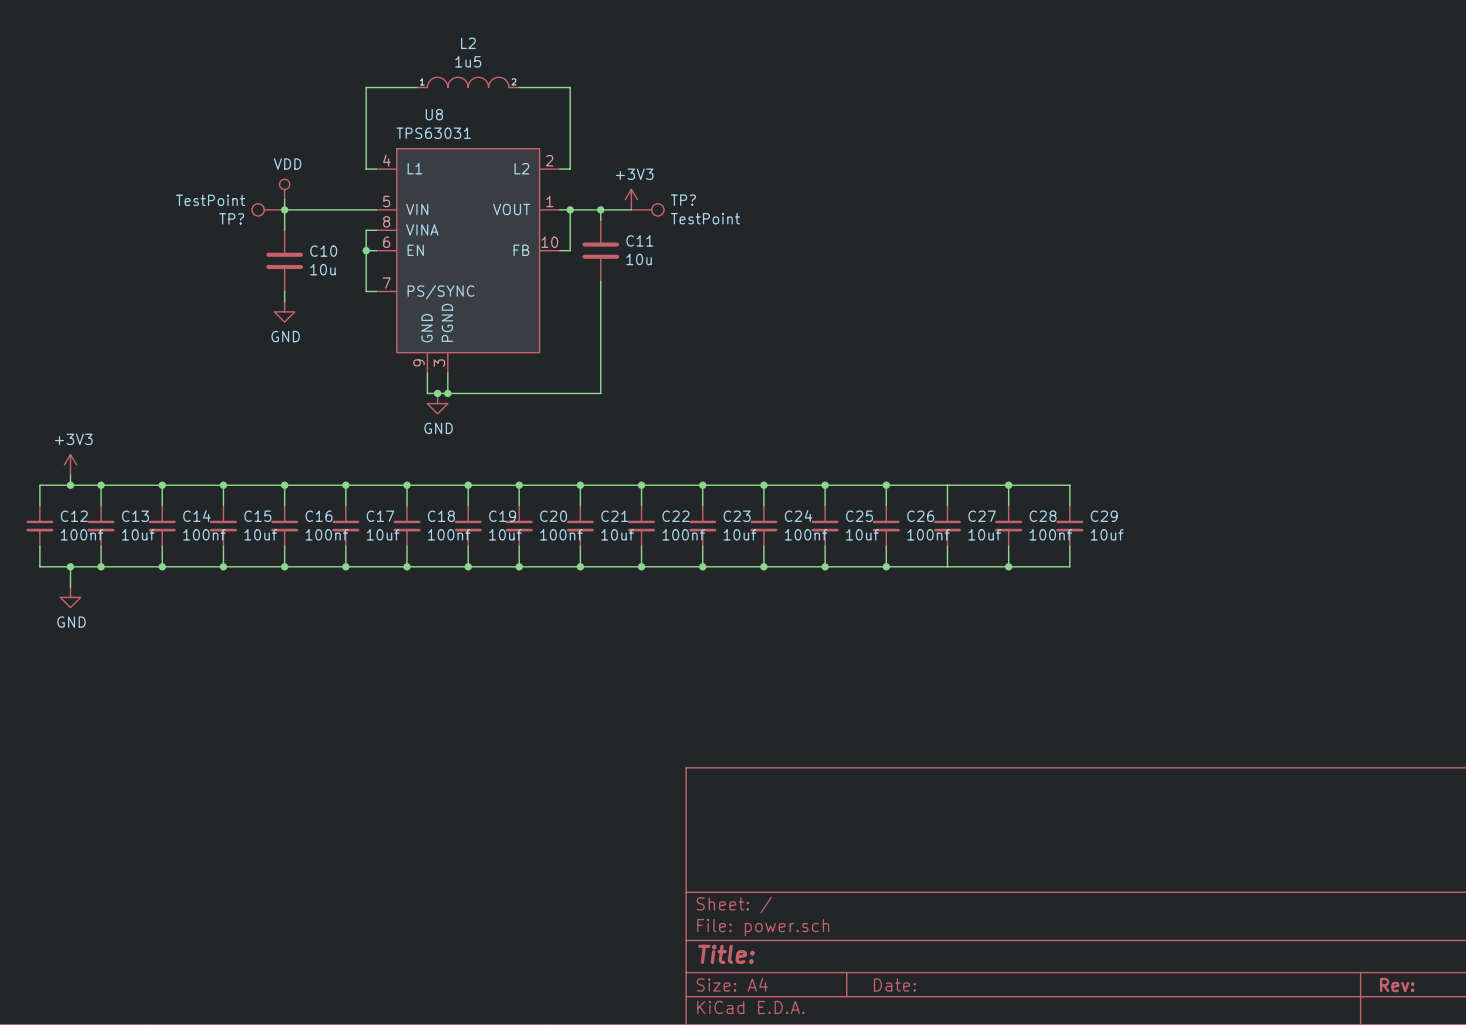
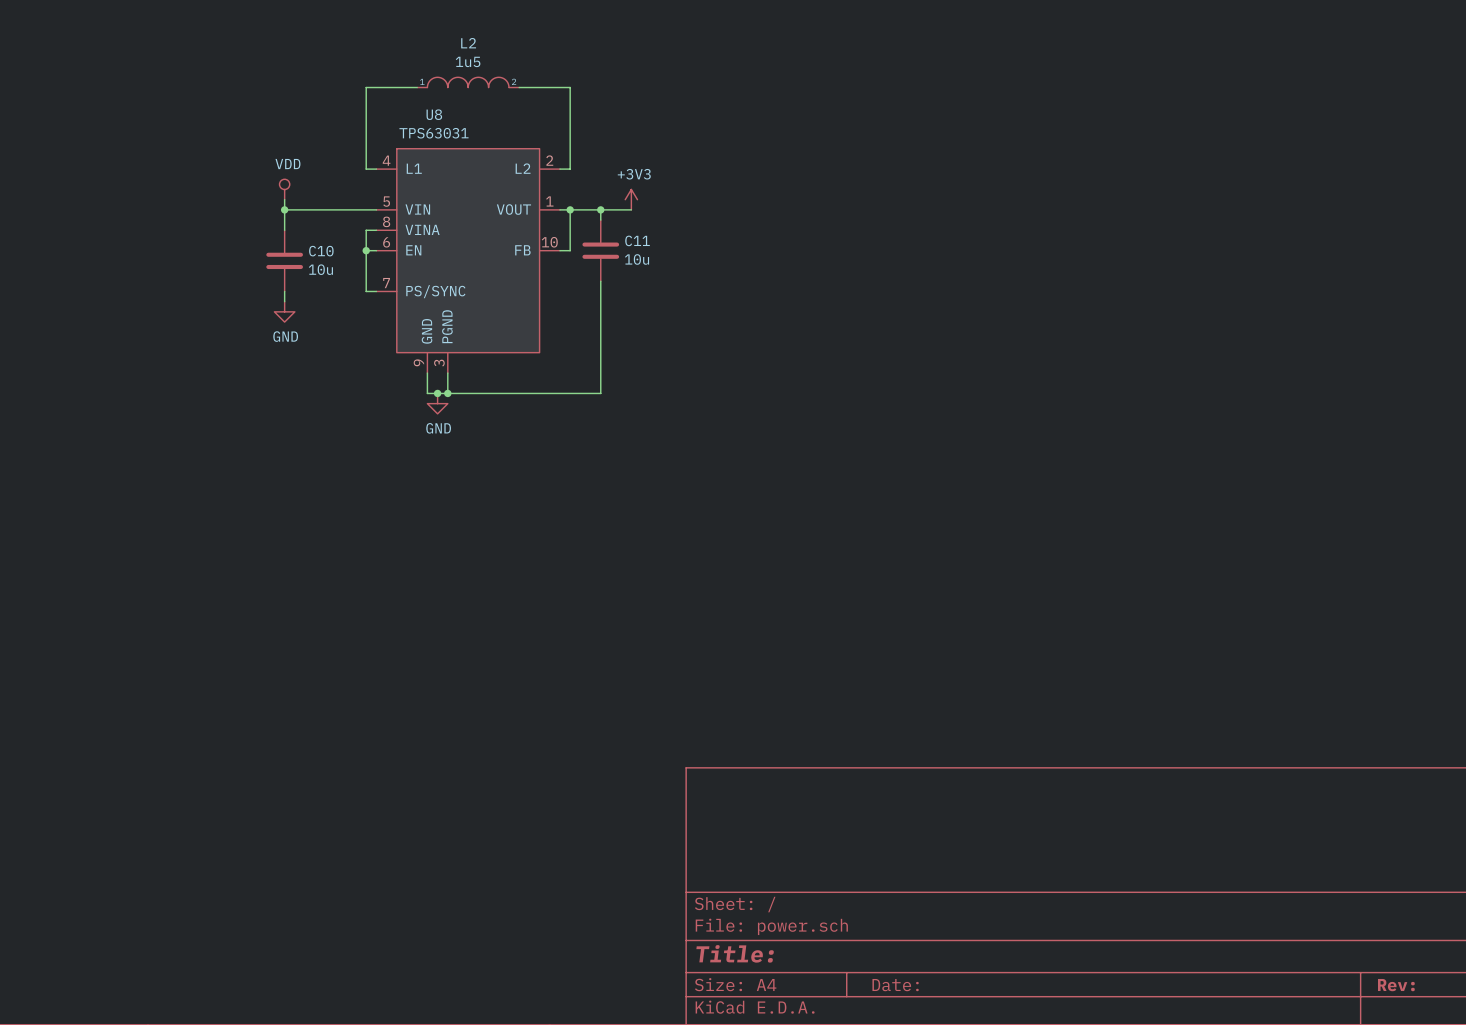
TP?: TestPoint (268, 209) -> none
TP?: TestPoint (647, 209) -> none
power symbol: +3V3 (70, 464) -> none
wire: (70, 475) (70, 485) -> none
junction: (70, 485) -> none
wire: (101, 485) (101, 505) -> none
junction: (101, 485) -> none
wire: (162, 485) (162, 505) -> none
junction: (162, 485) -> none
wire: (223, 485) (223, 505) -> none
junction: (223, 485) -> none
wire: (284, 485) (284, 505) -> none
junction: (284, 485) -> none
wire: (345, 485) (345, 505) -> none
junction: (345, 485) -> none
wire: (407, 485) (407, 505) -> none
junction: (407, 485) -> none
wire: (468, 485) (468, 505) -> none
junction: (468, 485) -> none
wire: (519, 485) (519, 505) -> none
junction: (519, 485) -> none
wire: (580, 485) (580, 505) -> none
junction: (580, 485) -> none
wire: (641, 485) (641, 505) -> none
junction: (641, 485) -> none
wire: (702, 485) (702, 505) -> none
junction: (702, 485) -> none
wire: (763, 485) (763, 505) -> none
junction: (763, 485) -> none
wire: (825, 485) (825, 505) -> none
junction: (825, 485) -> none
wire: (886, 485) (886, 505) -> none
junction: (886, 485) -> none
wire: (947, 485) (947, 505) -> none
wire: (1008, 485) (1008, 505) -> none
junction: (1008, 485) -> none
wire: (39, 505) (39, 485) (1069, 485) (1069, 505) -> none
C12: 100nf (39, 526) -> none
C13: 10uf (101, 526) -> none
C14: 100nf (162, 526) -> none
C15: 10uf (223, 526) -> none
C16: 100nf (284, 526) -> none
C17: 10uf (345, 526) -> none
C18: 100nf (407, 526) -> none
C19: 10uf (468, 526) -> none
C20: 100nf (519, 526) -> none
C21: 10uf (580, 526) -> none
C22: 100nf (641, 526) -> none
C23: 10uf (702, 526) -> none
C24: 100nf (763, 526) -> none
C25: 10uf (825, 526) -> none
C26: 100nf (886, 526) -> none
C27: 10uf (947, 526) -> none
C28: 100nf (1008, 526) -> none
C29: 10uf (1069, 526) -> none
wire: (39, 546) (39, 566) (1069, 566) (1069, 546) -> none
wire: (101, 546) (101, 566) -> none
wire: (162, 546) (162, 566) -> none
wire: (223, 546) (223, 566) -> none
wire: (284, 546) (284, 566) -> none
wire: (345, 546) (345, 566) -> none
wire: (407, 546) (407, 566) -> none
wire: (468, 546) (468, 566) -> none
wire: (519, 546) (519, 566) -> none
wire: (580, 546) (580, 566) -> none
wire: (641, 546) (641, 566) -> none
wire: (702, 546) (702, 566) -> none
wire: (763, 546) (763, 566) -> none
wire: (825, 546) (825, 566) -> none
wire: (886, 546) (886, 566) -> none
wire: (947, 546) (947, 566) -> none
wire: (1008, 546) (1008, 566) -> none
wire: (70, 566) (70, 587) -> none
junction: (70, 566) -> none
junction: (101, 566) -> none
junction: (162, 566) -> none
junction: (223, 566) -> none
junction: (284, 566) -> none
junction: (345, 566) -> none
junction: (407, 566) -> none
junction: (468, 566) -> none
junction: (519, 566) -> none
junction: (580, 566) -> none
junction: (641, 566) -> none
junction: (702, 566) -> none
junction: (763, 566) -> none
junction: (825, 566) -> none
junction: (886, 566) -> none
junction: (1008, 566) -> none
power symbol: GND (70, 597) -> none

